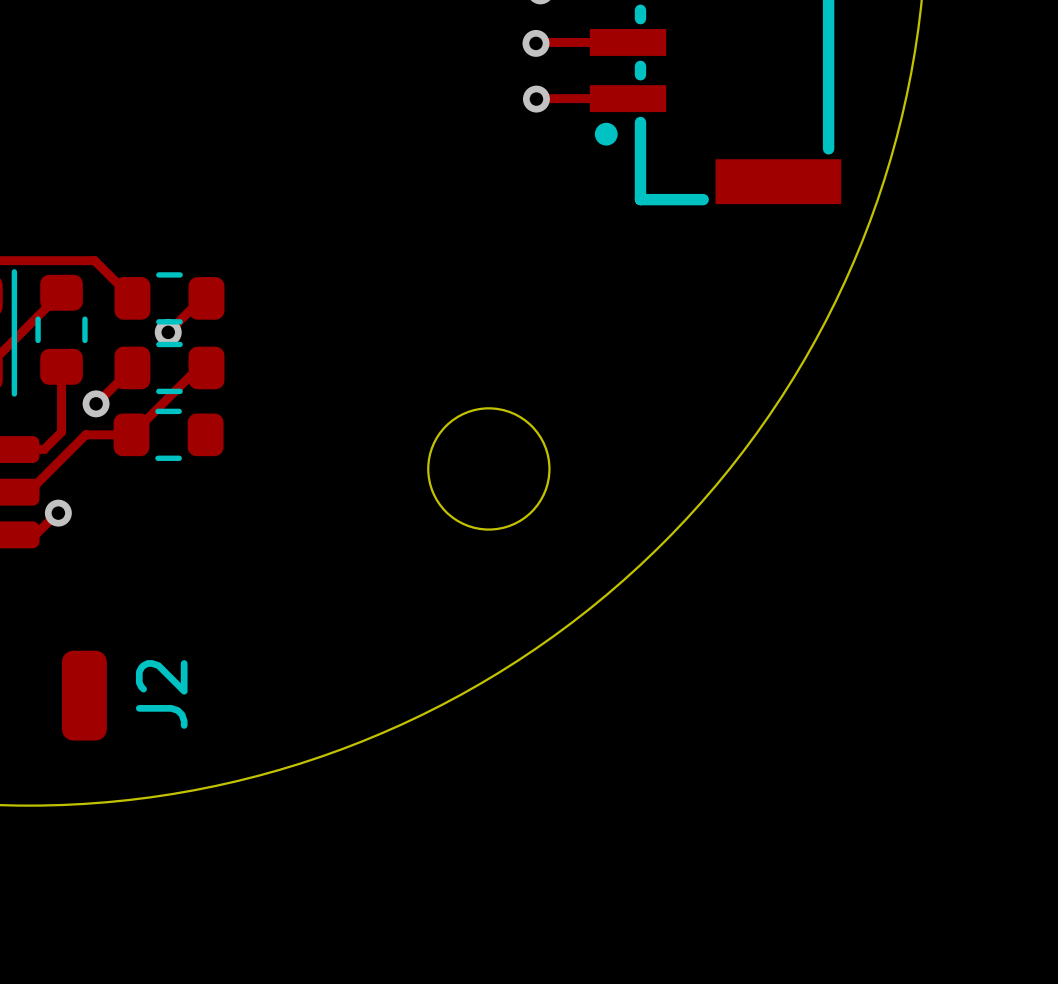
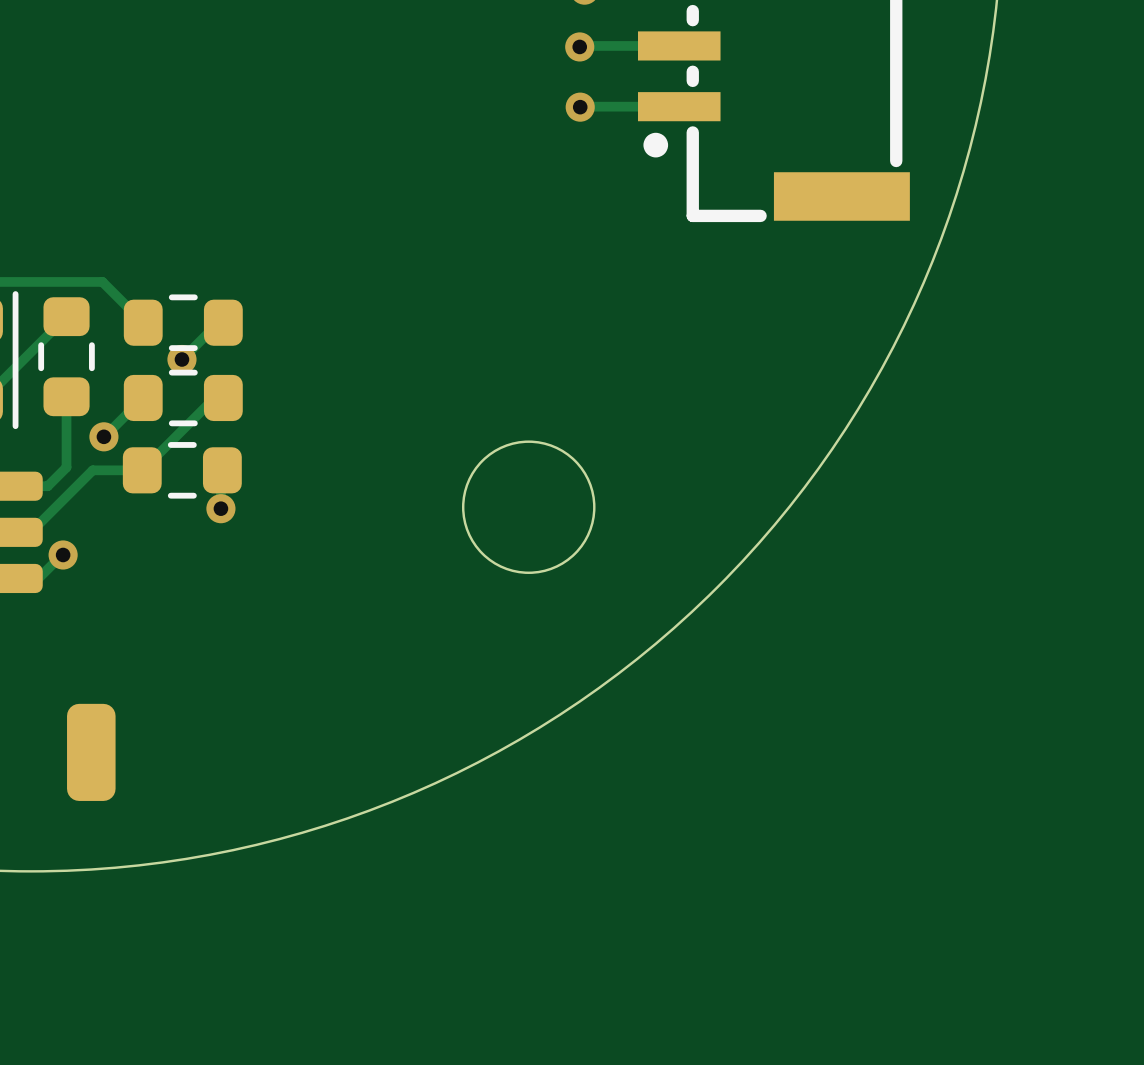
via: none -> (220, 508)
J2 name: J2 (161, 694) -> none

